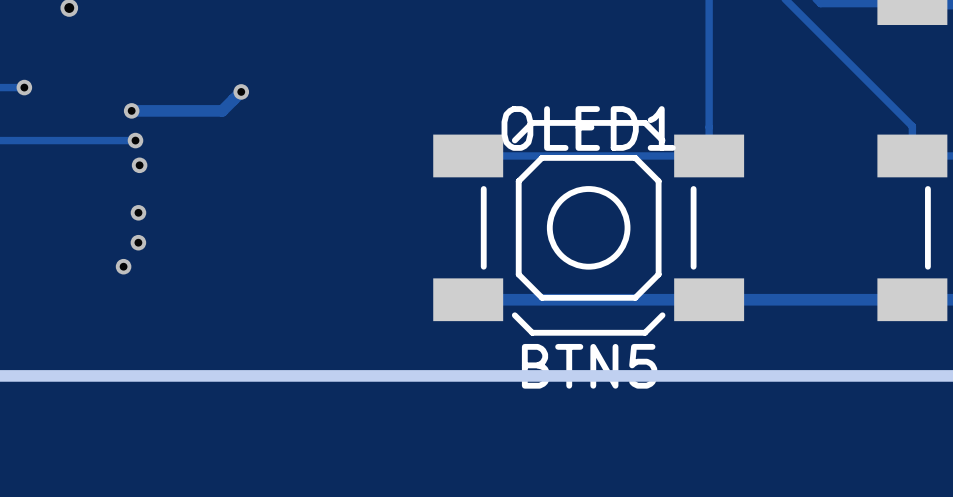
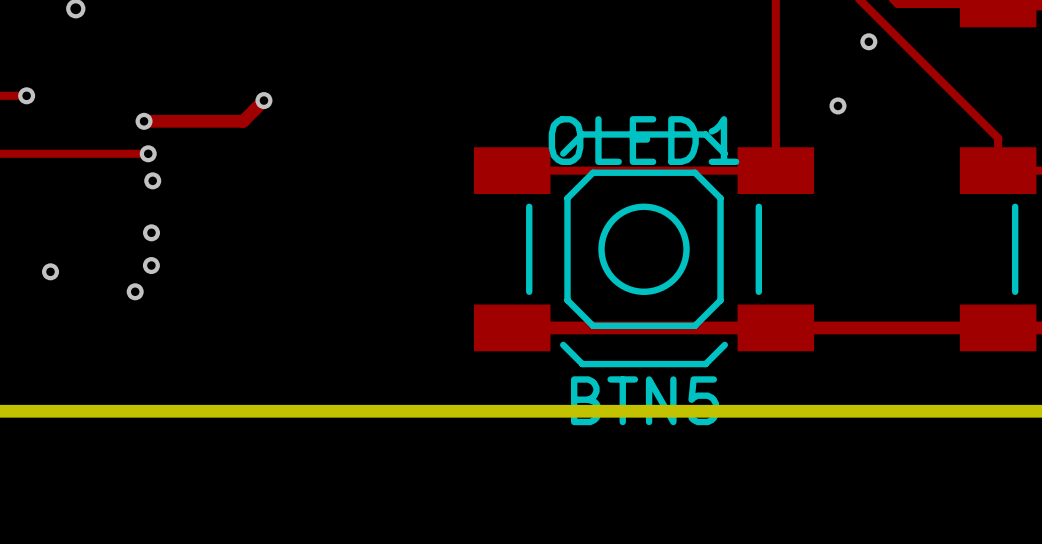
via: none -> (868, 41)
via: none -> (837, 105)
via: none -> (50, 271)

